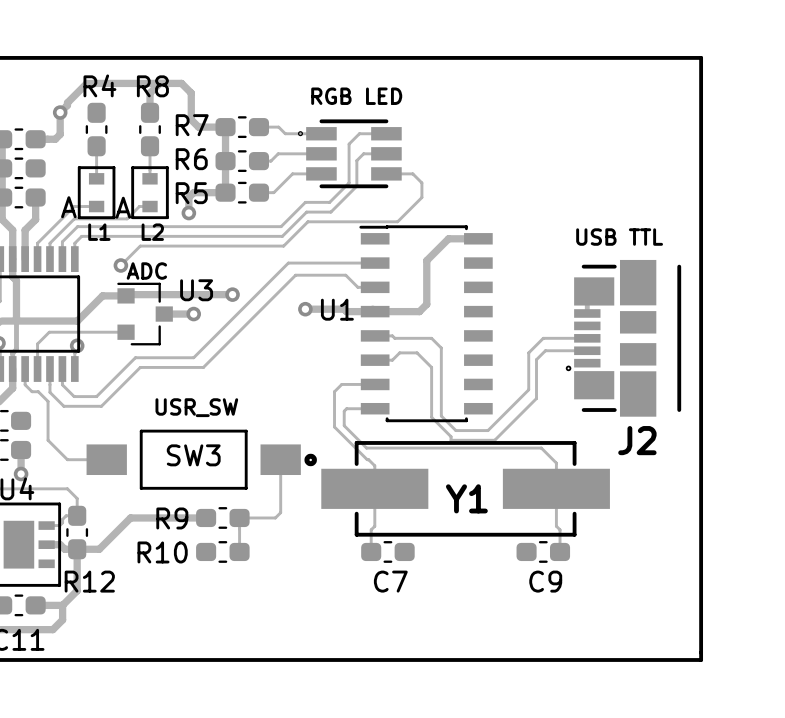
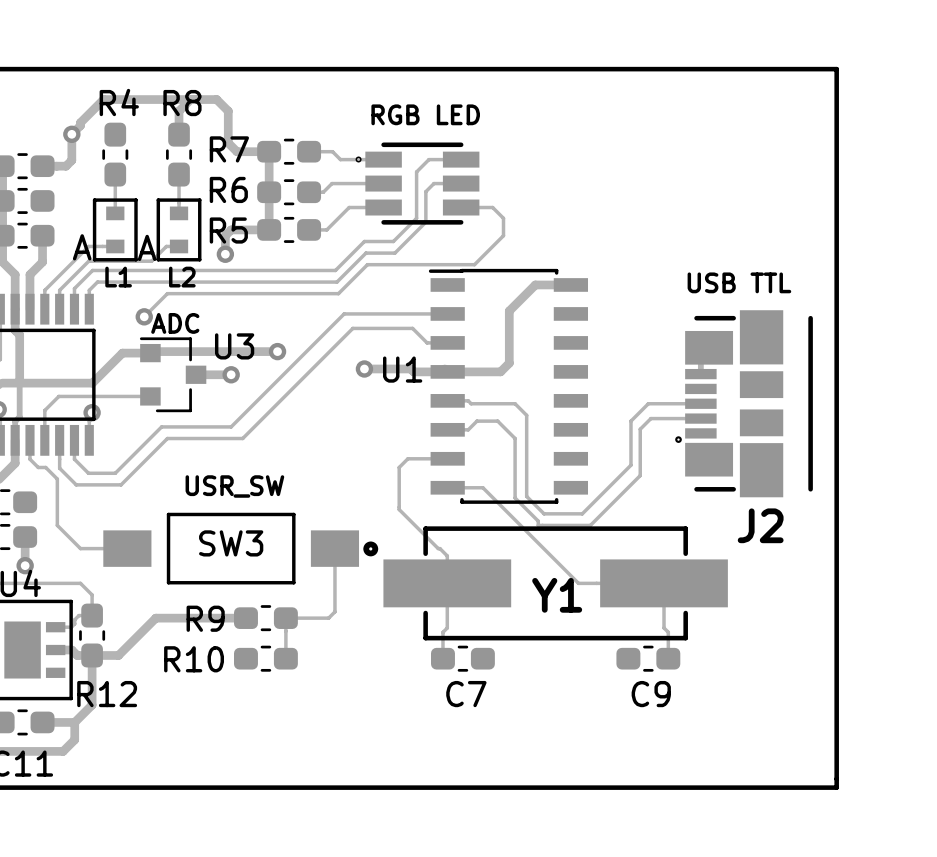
track: (375, 408) (346, 408) (344, 411) (344, 425) (366, 448) (541, 448) (556, 463) (556, 488) -> (447, 487) (482, 487) (578, 583) (664, 583)

